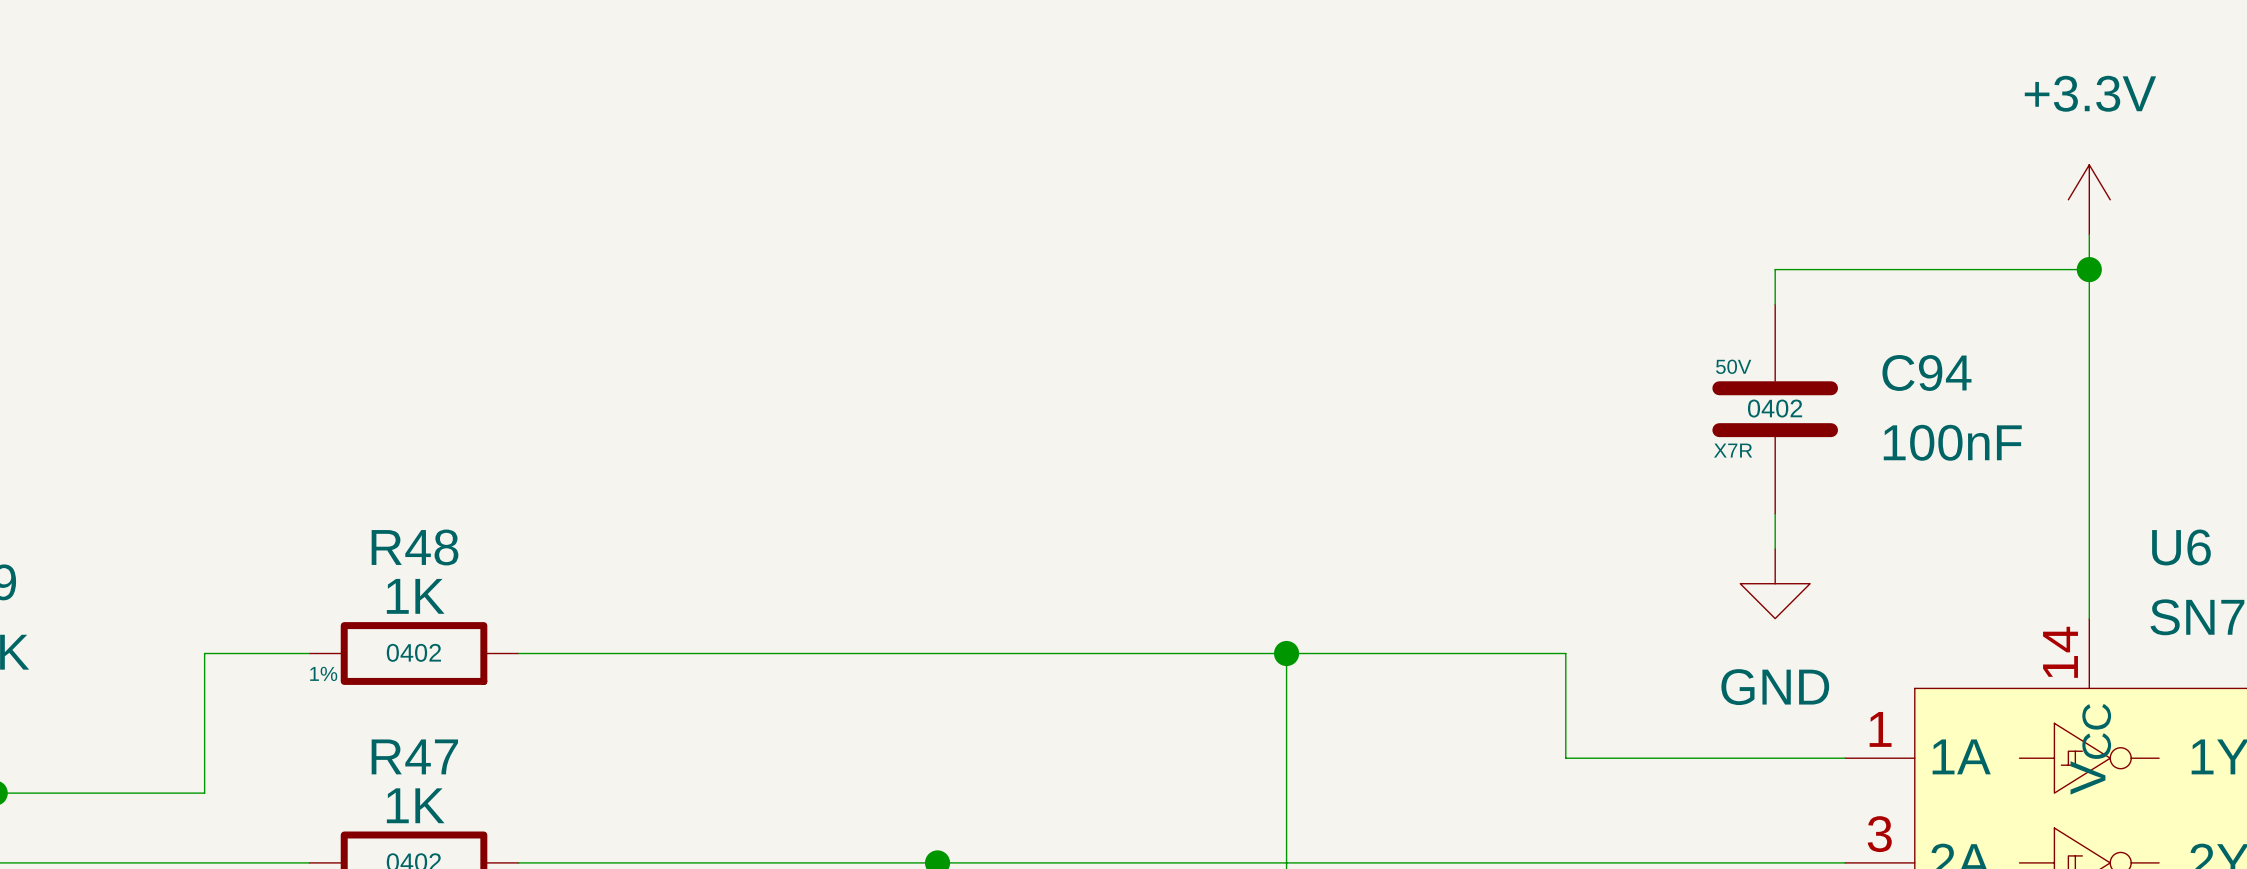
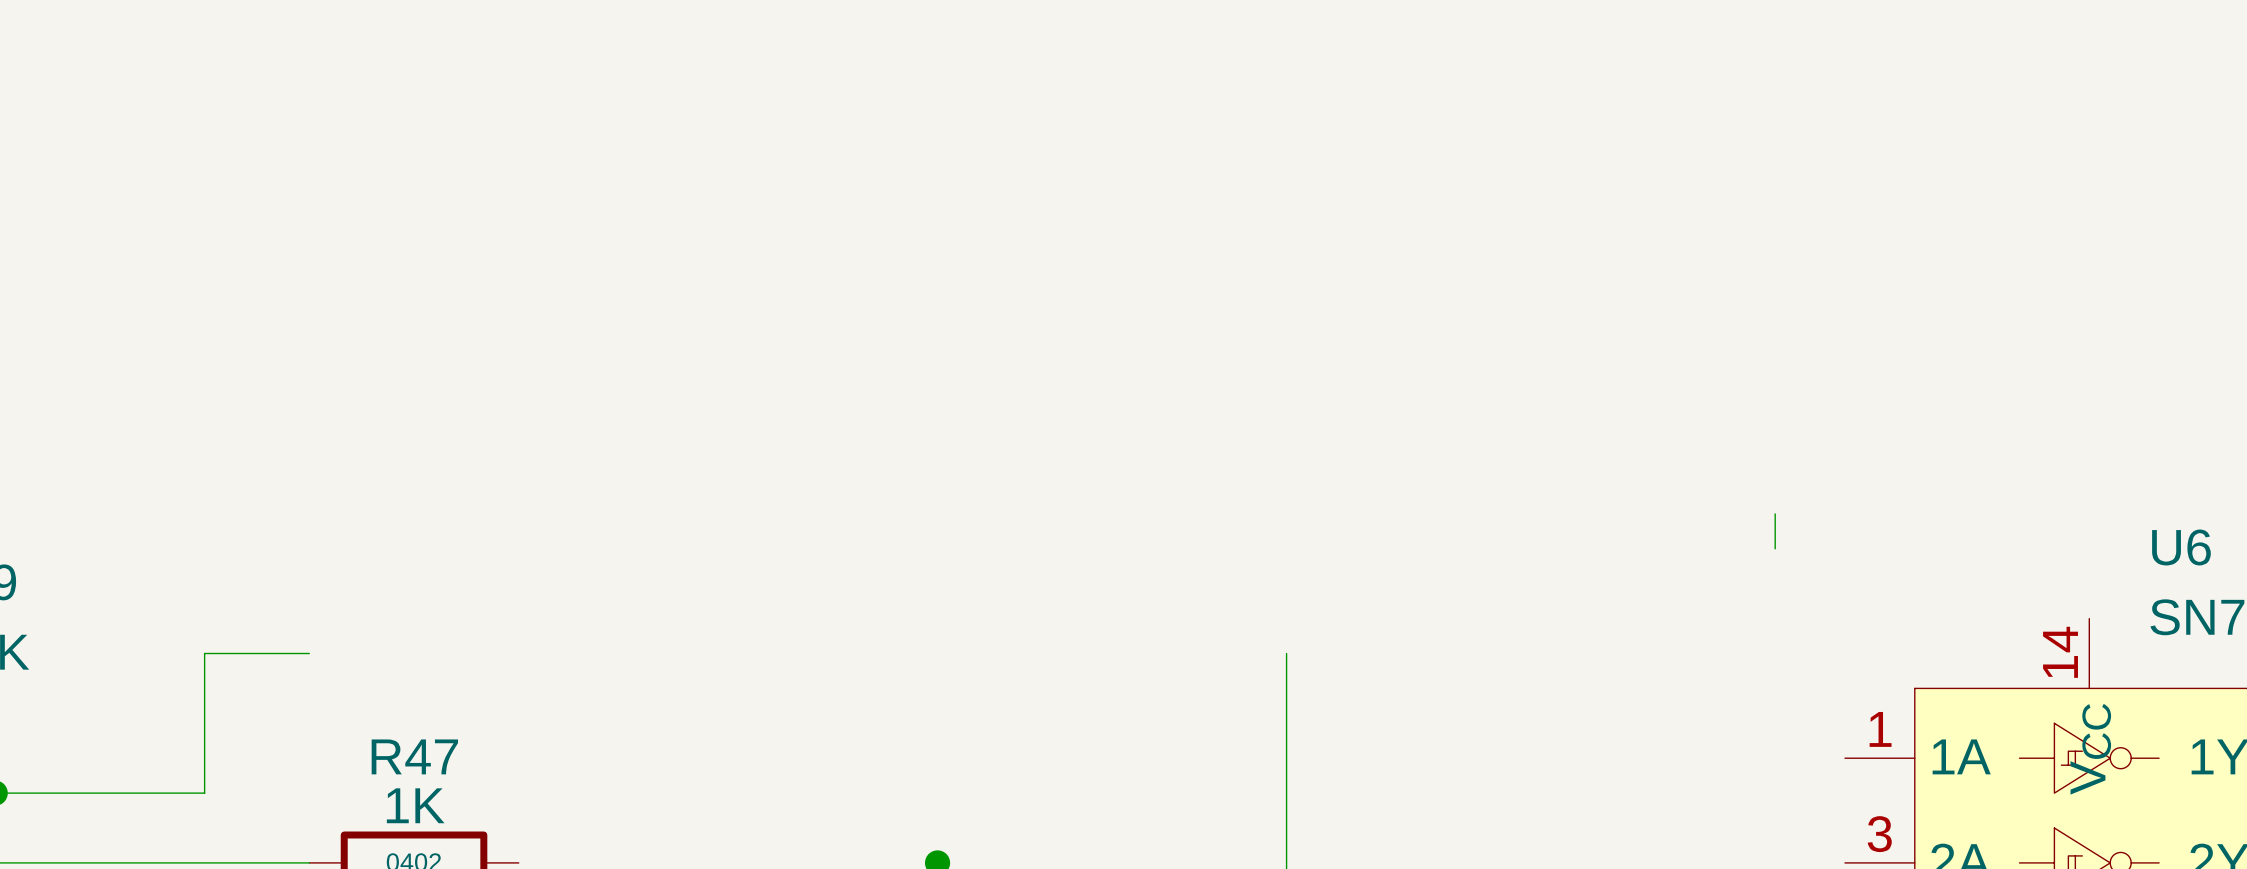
power symbol: +3.3V (2089, 199) -> none
wire: (2089, 234) (2089, 618) -> none
wire: (2089, 269) (1775, 269) (1775, 304) -> none
junction: (2089, 269) -> none
C94: 100nF (1775, 409) -> none
power symbol: GND (1775, 583) -> none
R48: 1K (414, 653) -> none
wire: (518, 653) (1565, 653) (1565, 758) (1844, 758) -> none
junction: (1286, 653) -> none
wire: (518, 862) (1844, 862) -> none

